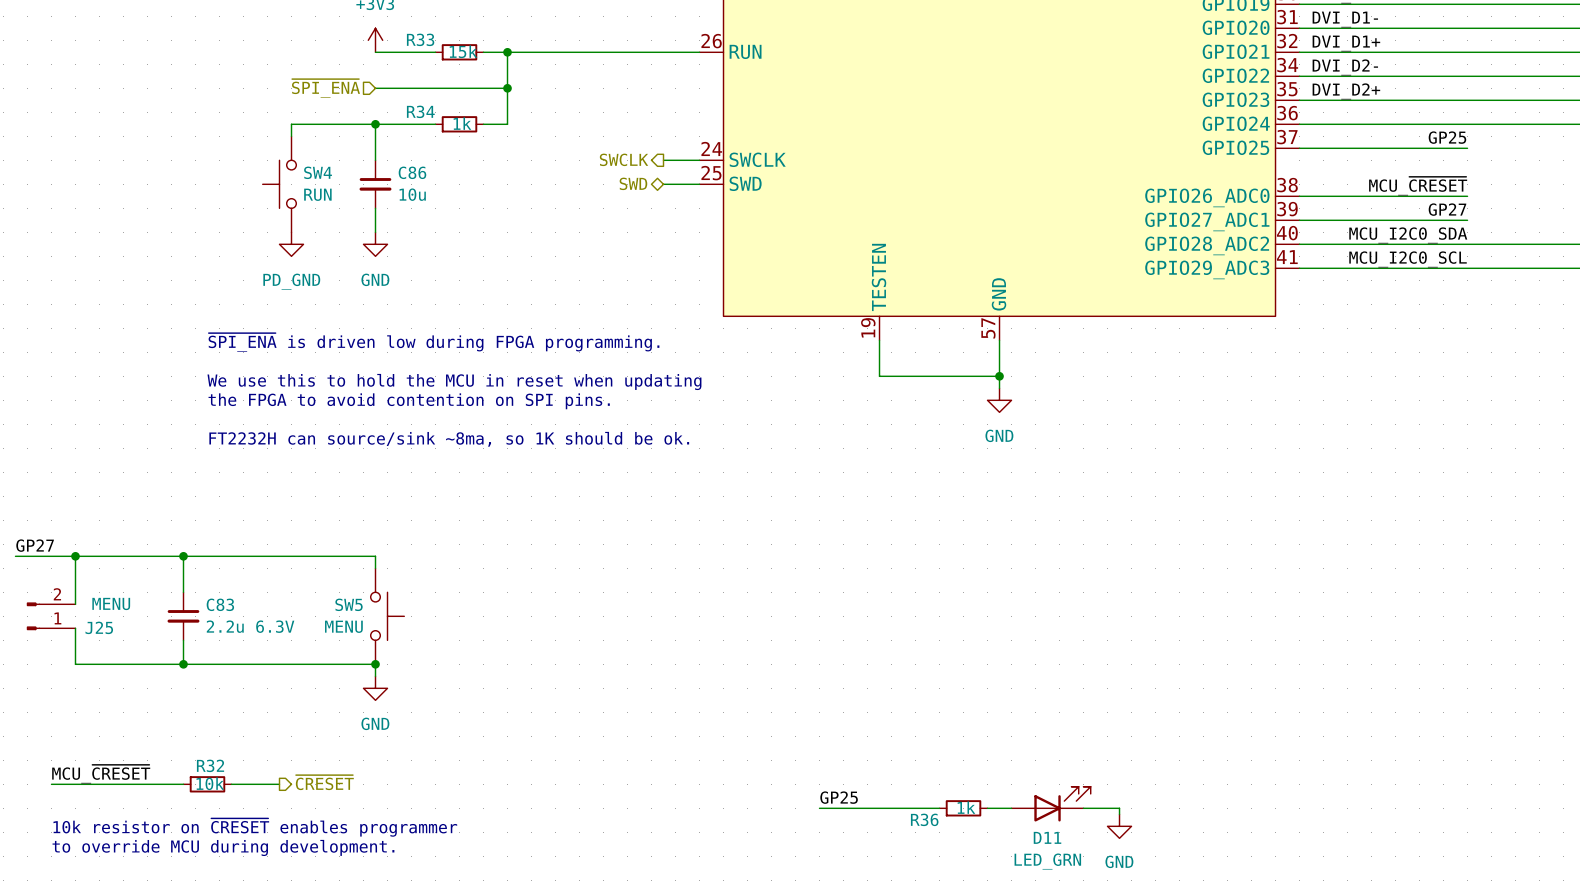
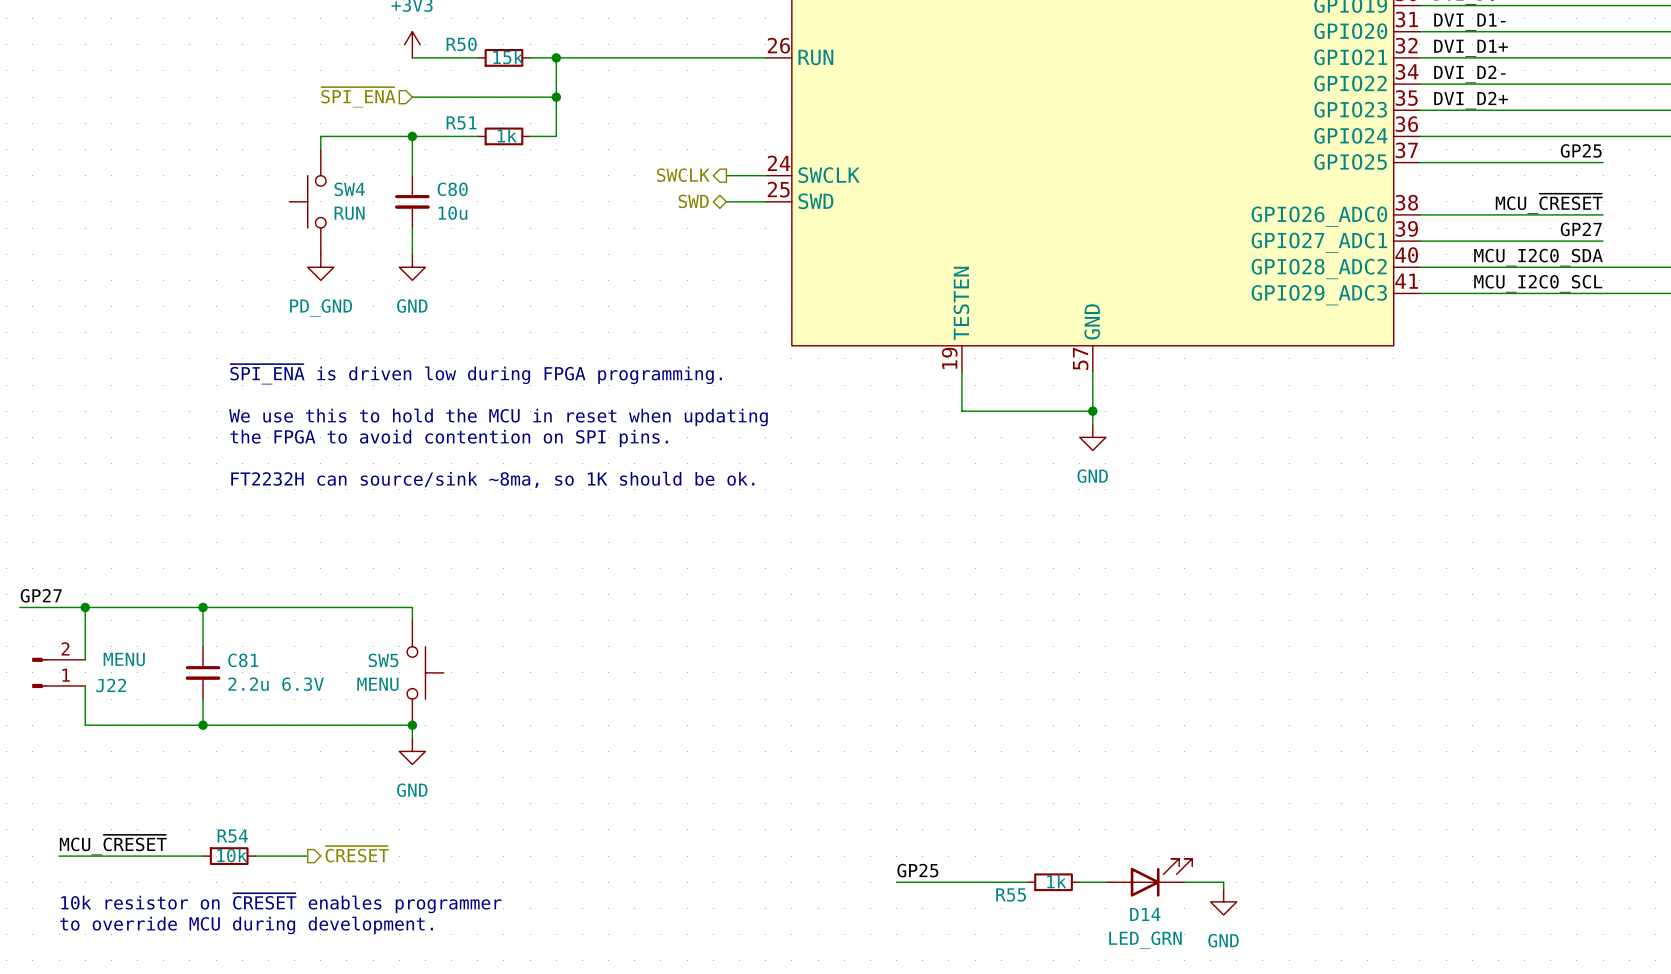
R33 name: R33 (420, 39) -> R50 (461, 44)
R34 name: R34 (420, 111) -> R51 (461, 122)
C86 name: C86 (412, 172) -> C80 (452, 189)
C83 name: C83 (220, 604) -> C81 (243, 660)
J25 name: J25 (99, 627) -> J22 (111, 685)
R32 name: R32 (210, 765) -> R54 (232, 836)
R36 name: R36 (924, 819) -> R55 (1011, 894)
D11 name: D11 (1047, 837) -> D14 (1145, 914)

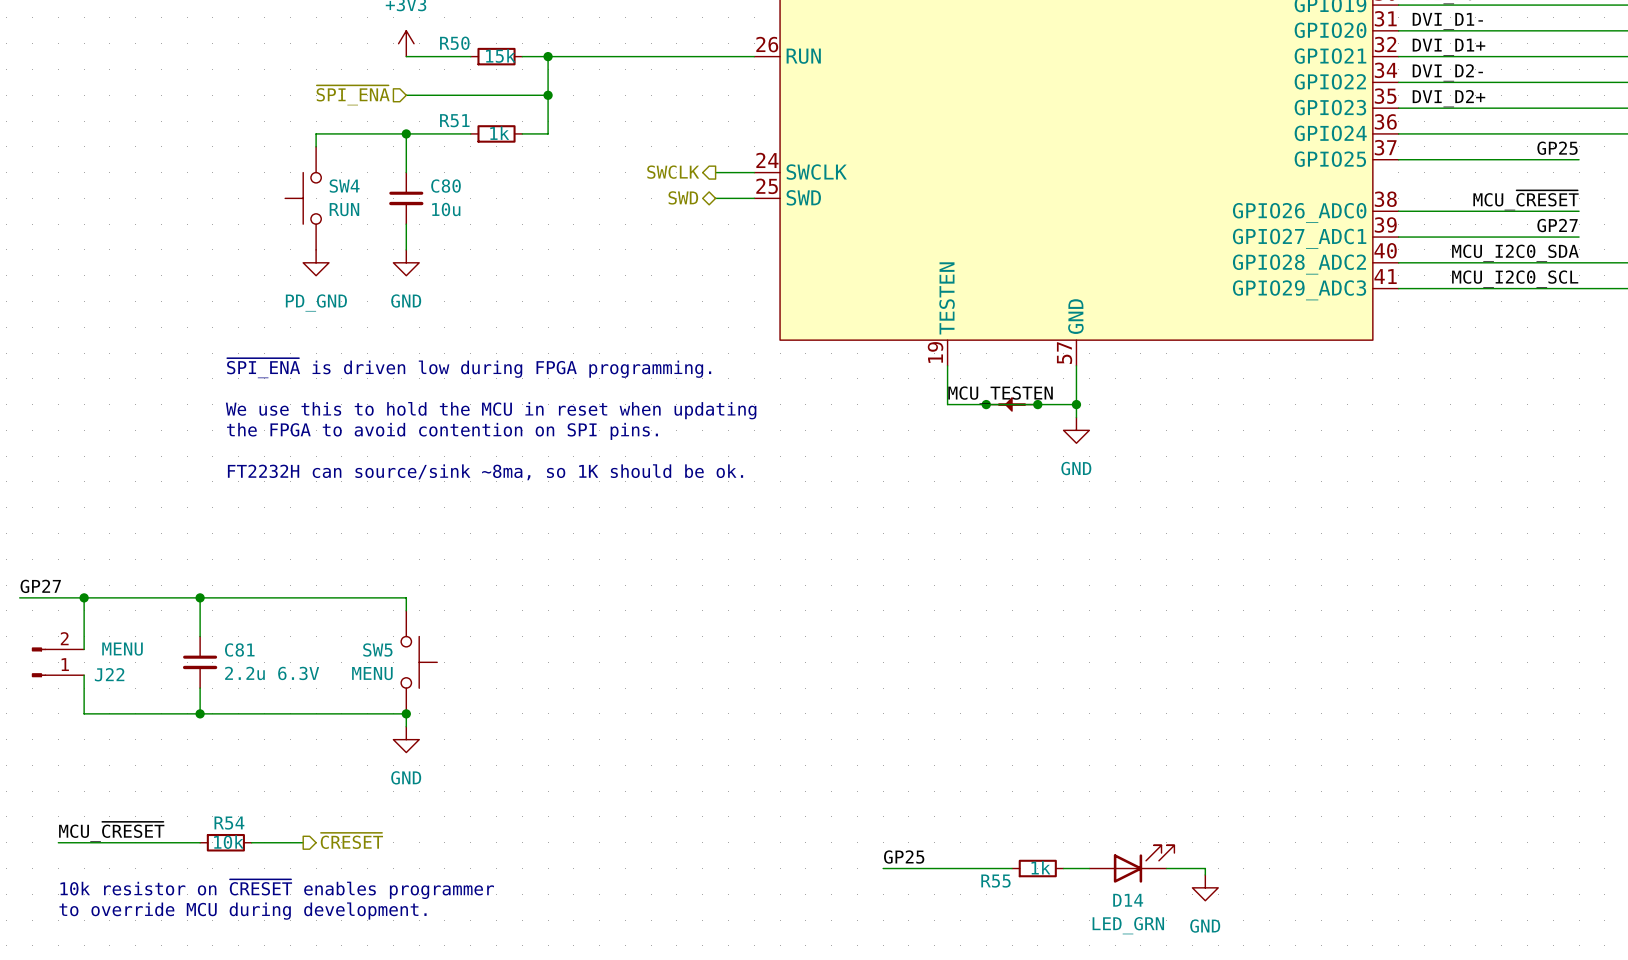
label: none -> MCU_TESTEN (1000, 395)
junction: none -> (986, 404)
part: none -> (1012, 404)
junction: none -> (1037, 404)

